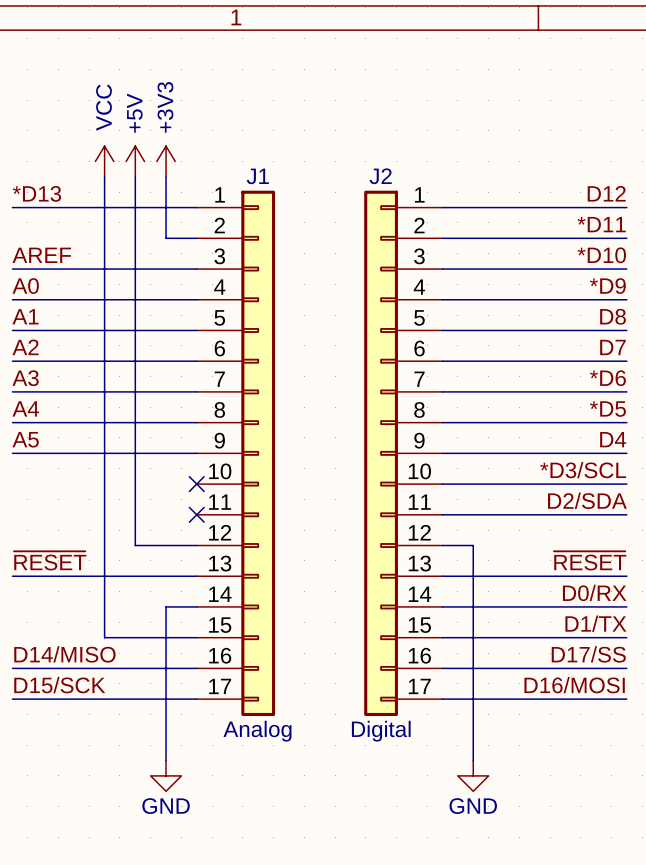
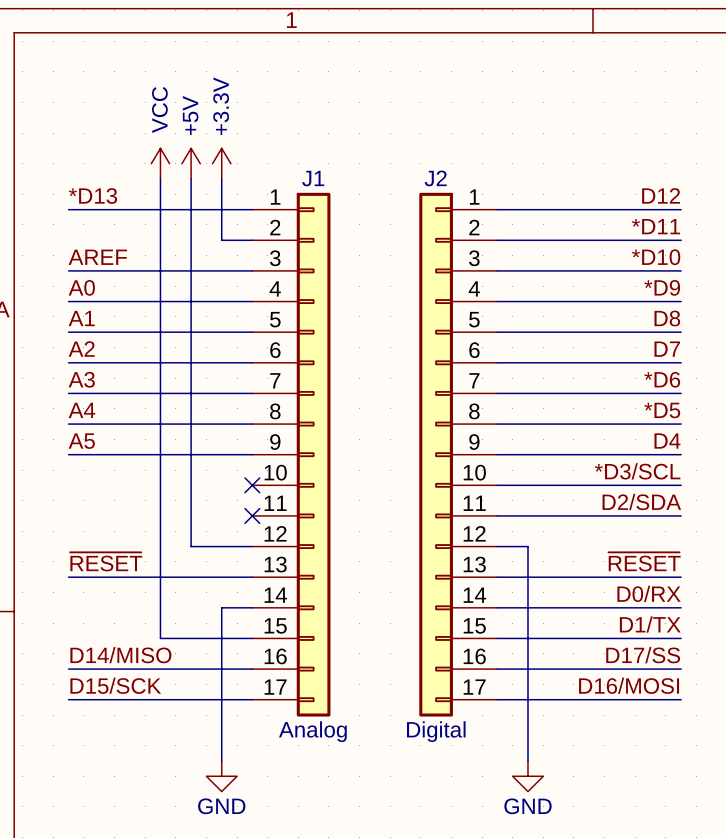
power symbol: +3V3 (166, 161) -> +3.3V (221, 163)

